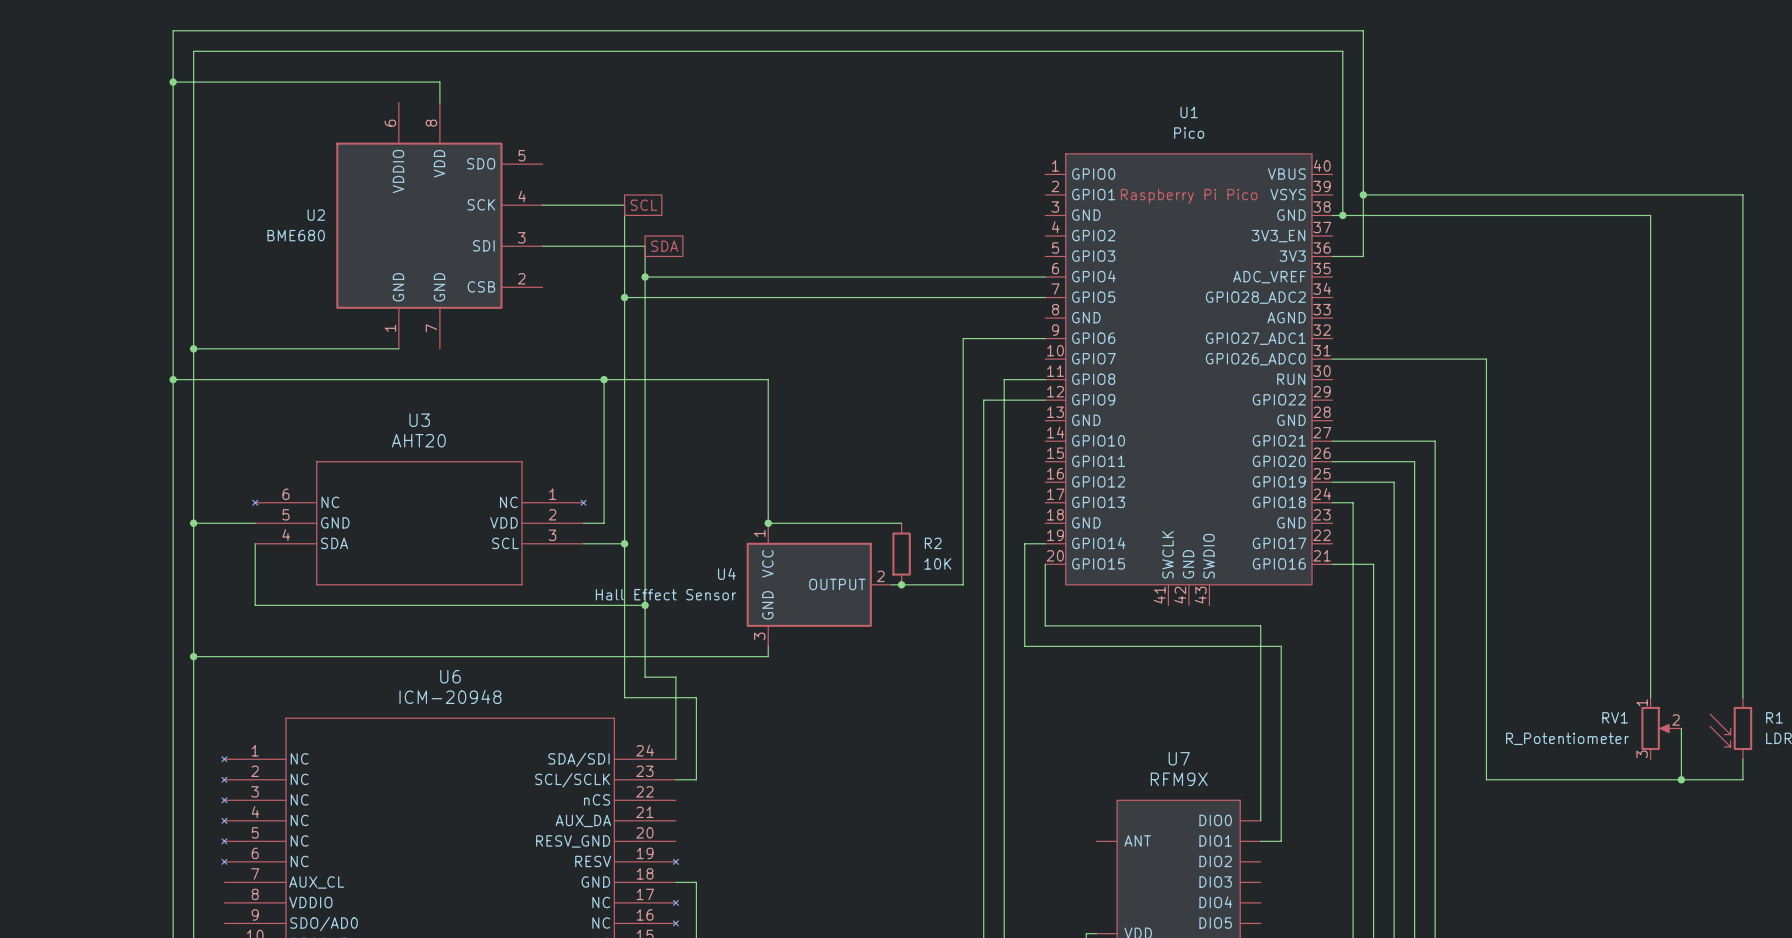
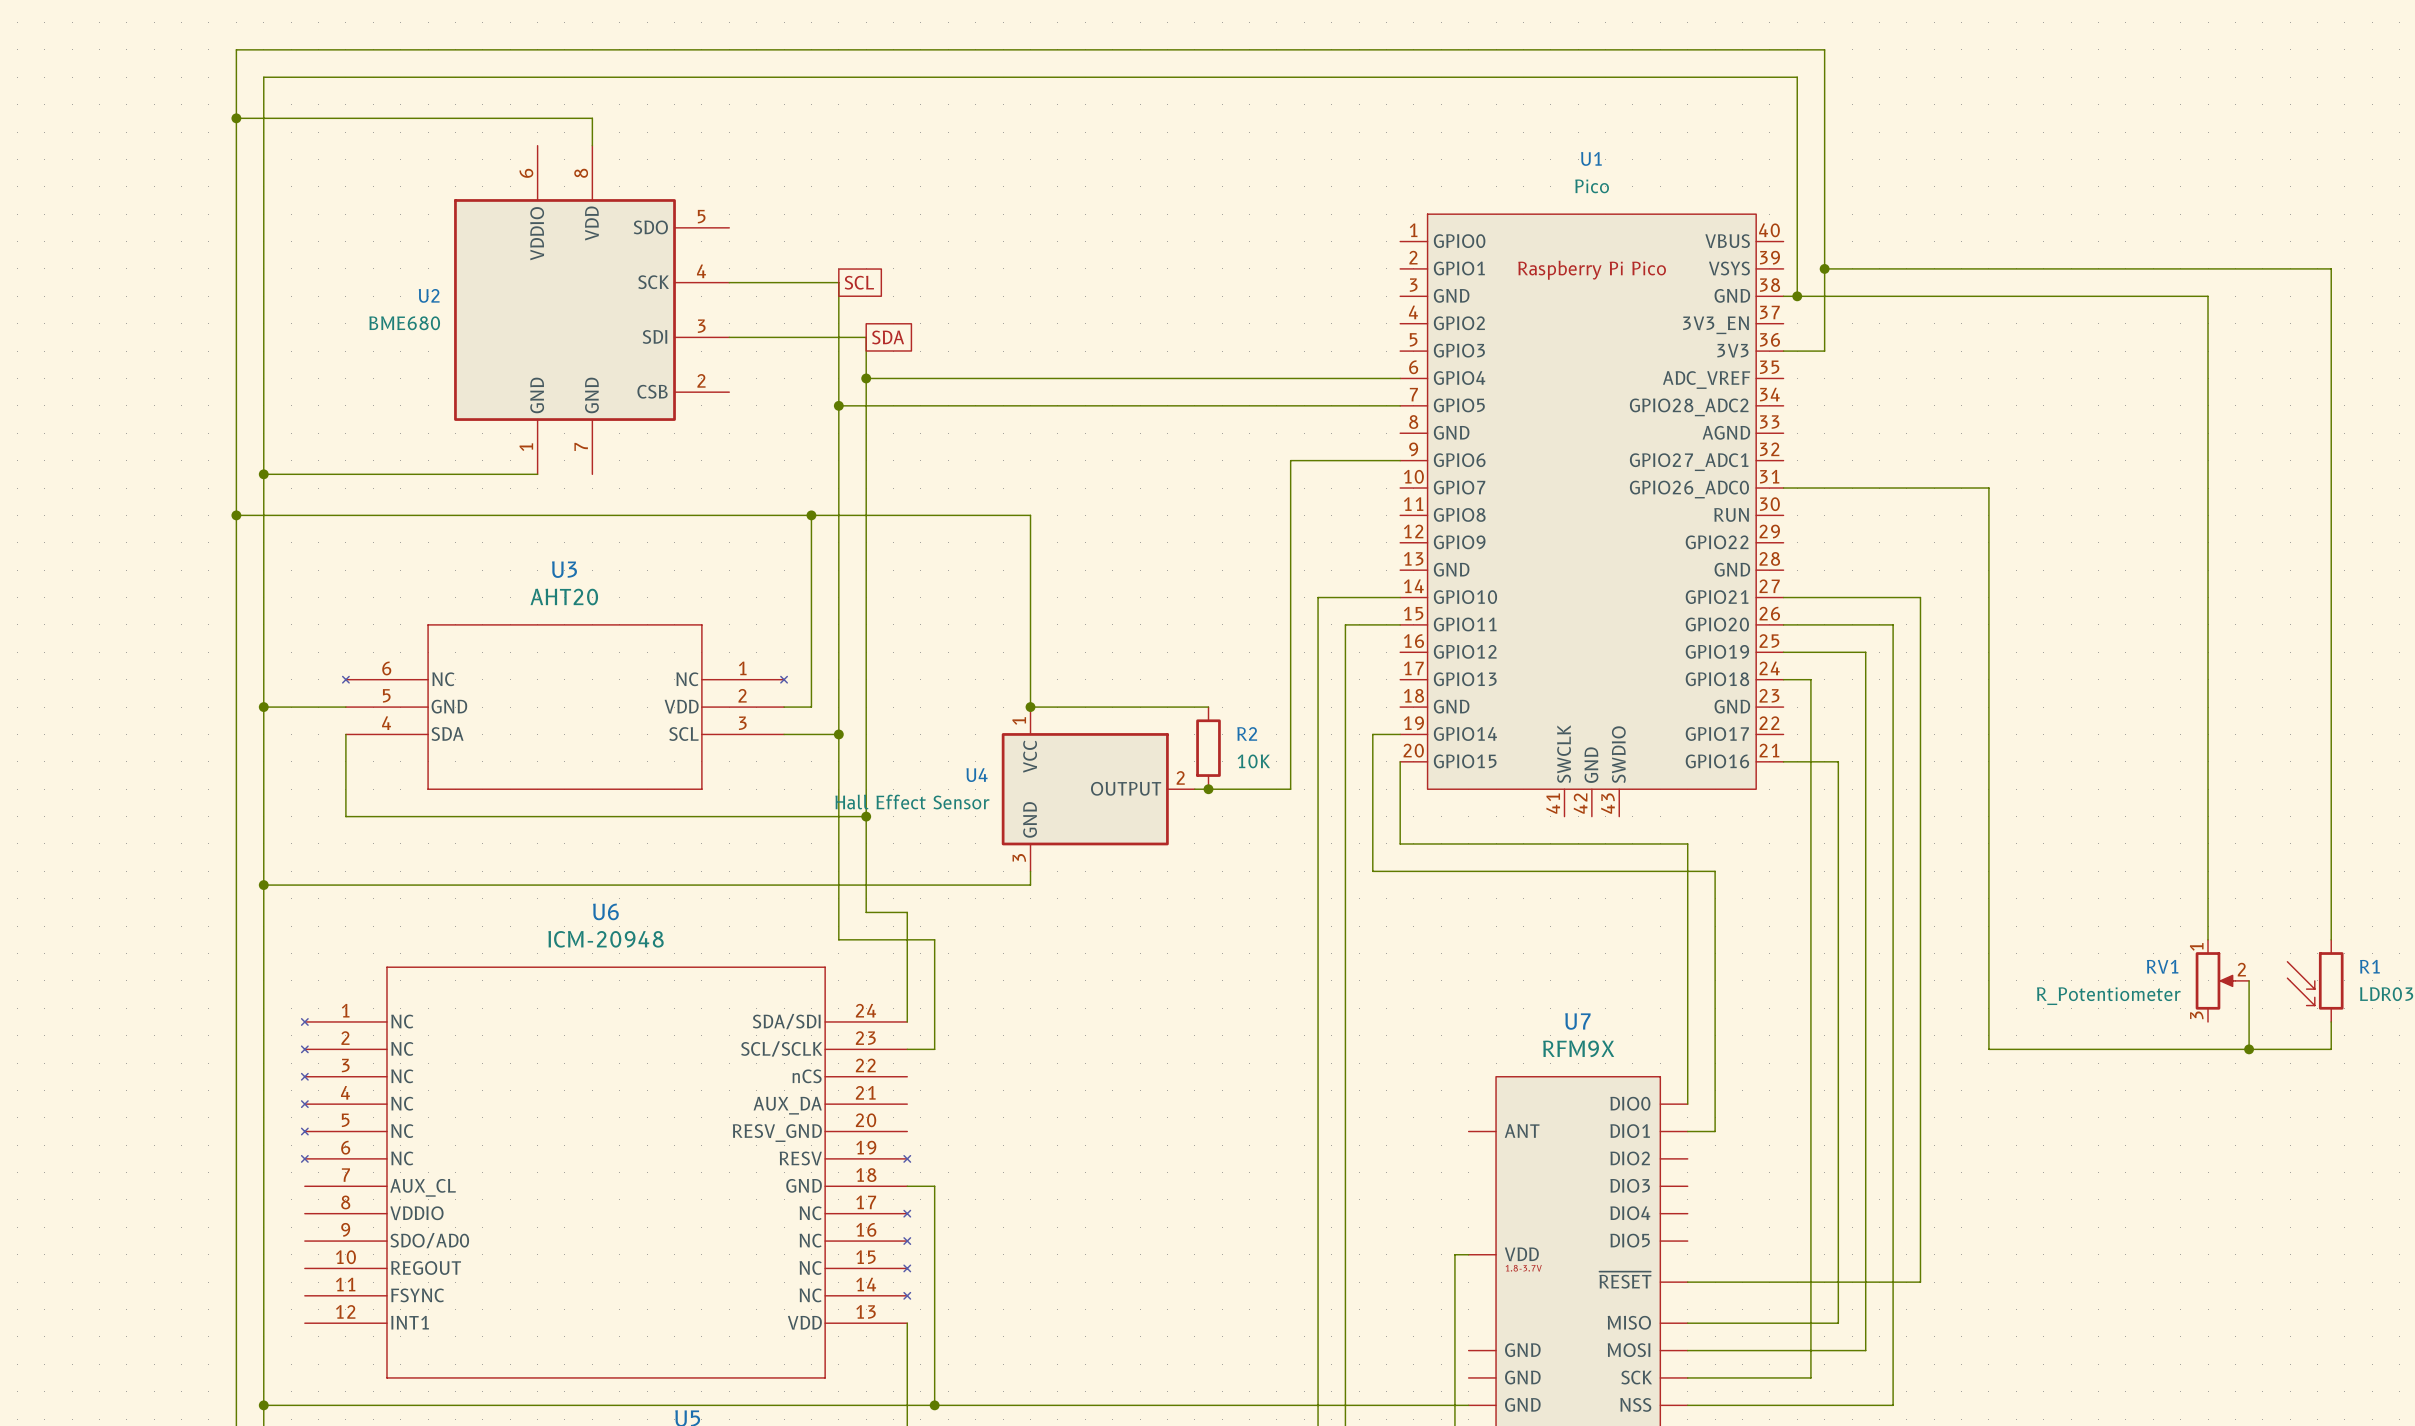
wire: (1045, 379) (1004, 379) (1004, 461) -> (1400, 624) (1345, 624)
wire: (1045, 400) (983, 400) (983, 441) -> (1400, 597) (1318, 597)

